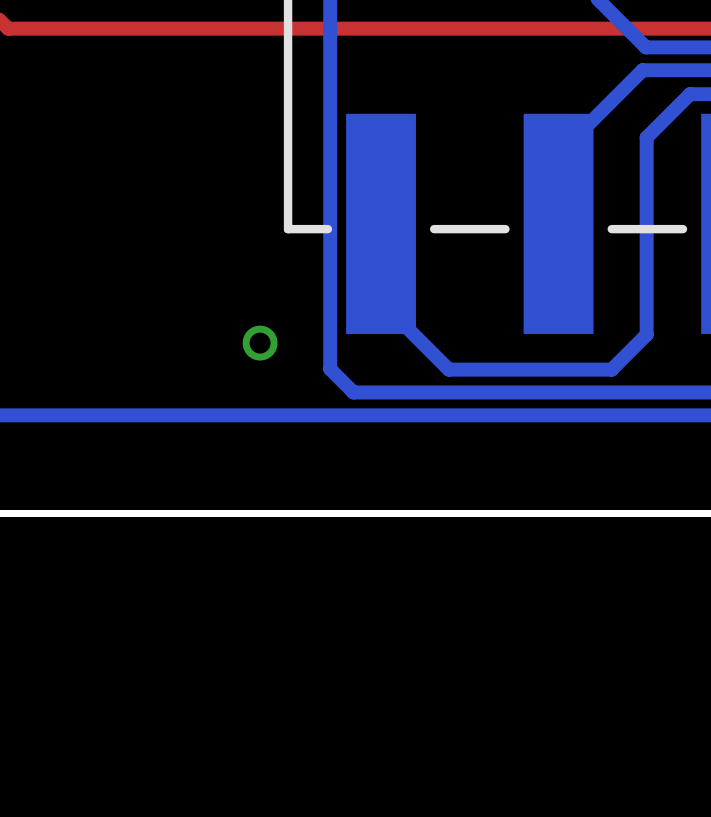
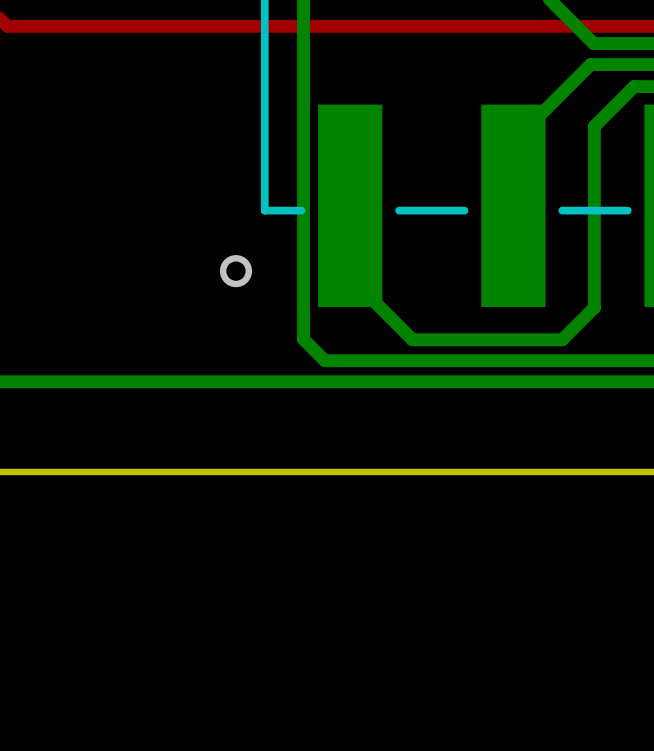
via position: (260, 343) -> (235, 271)

